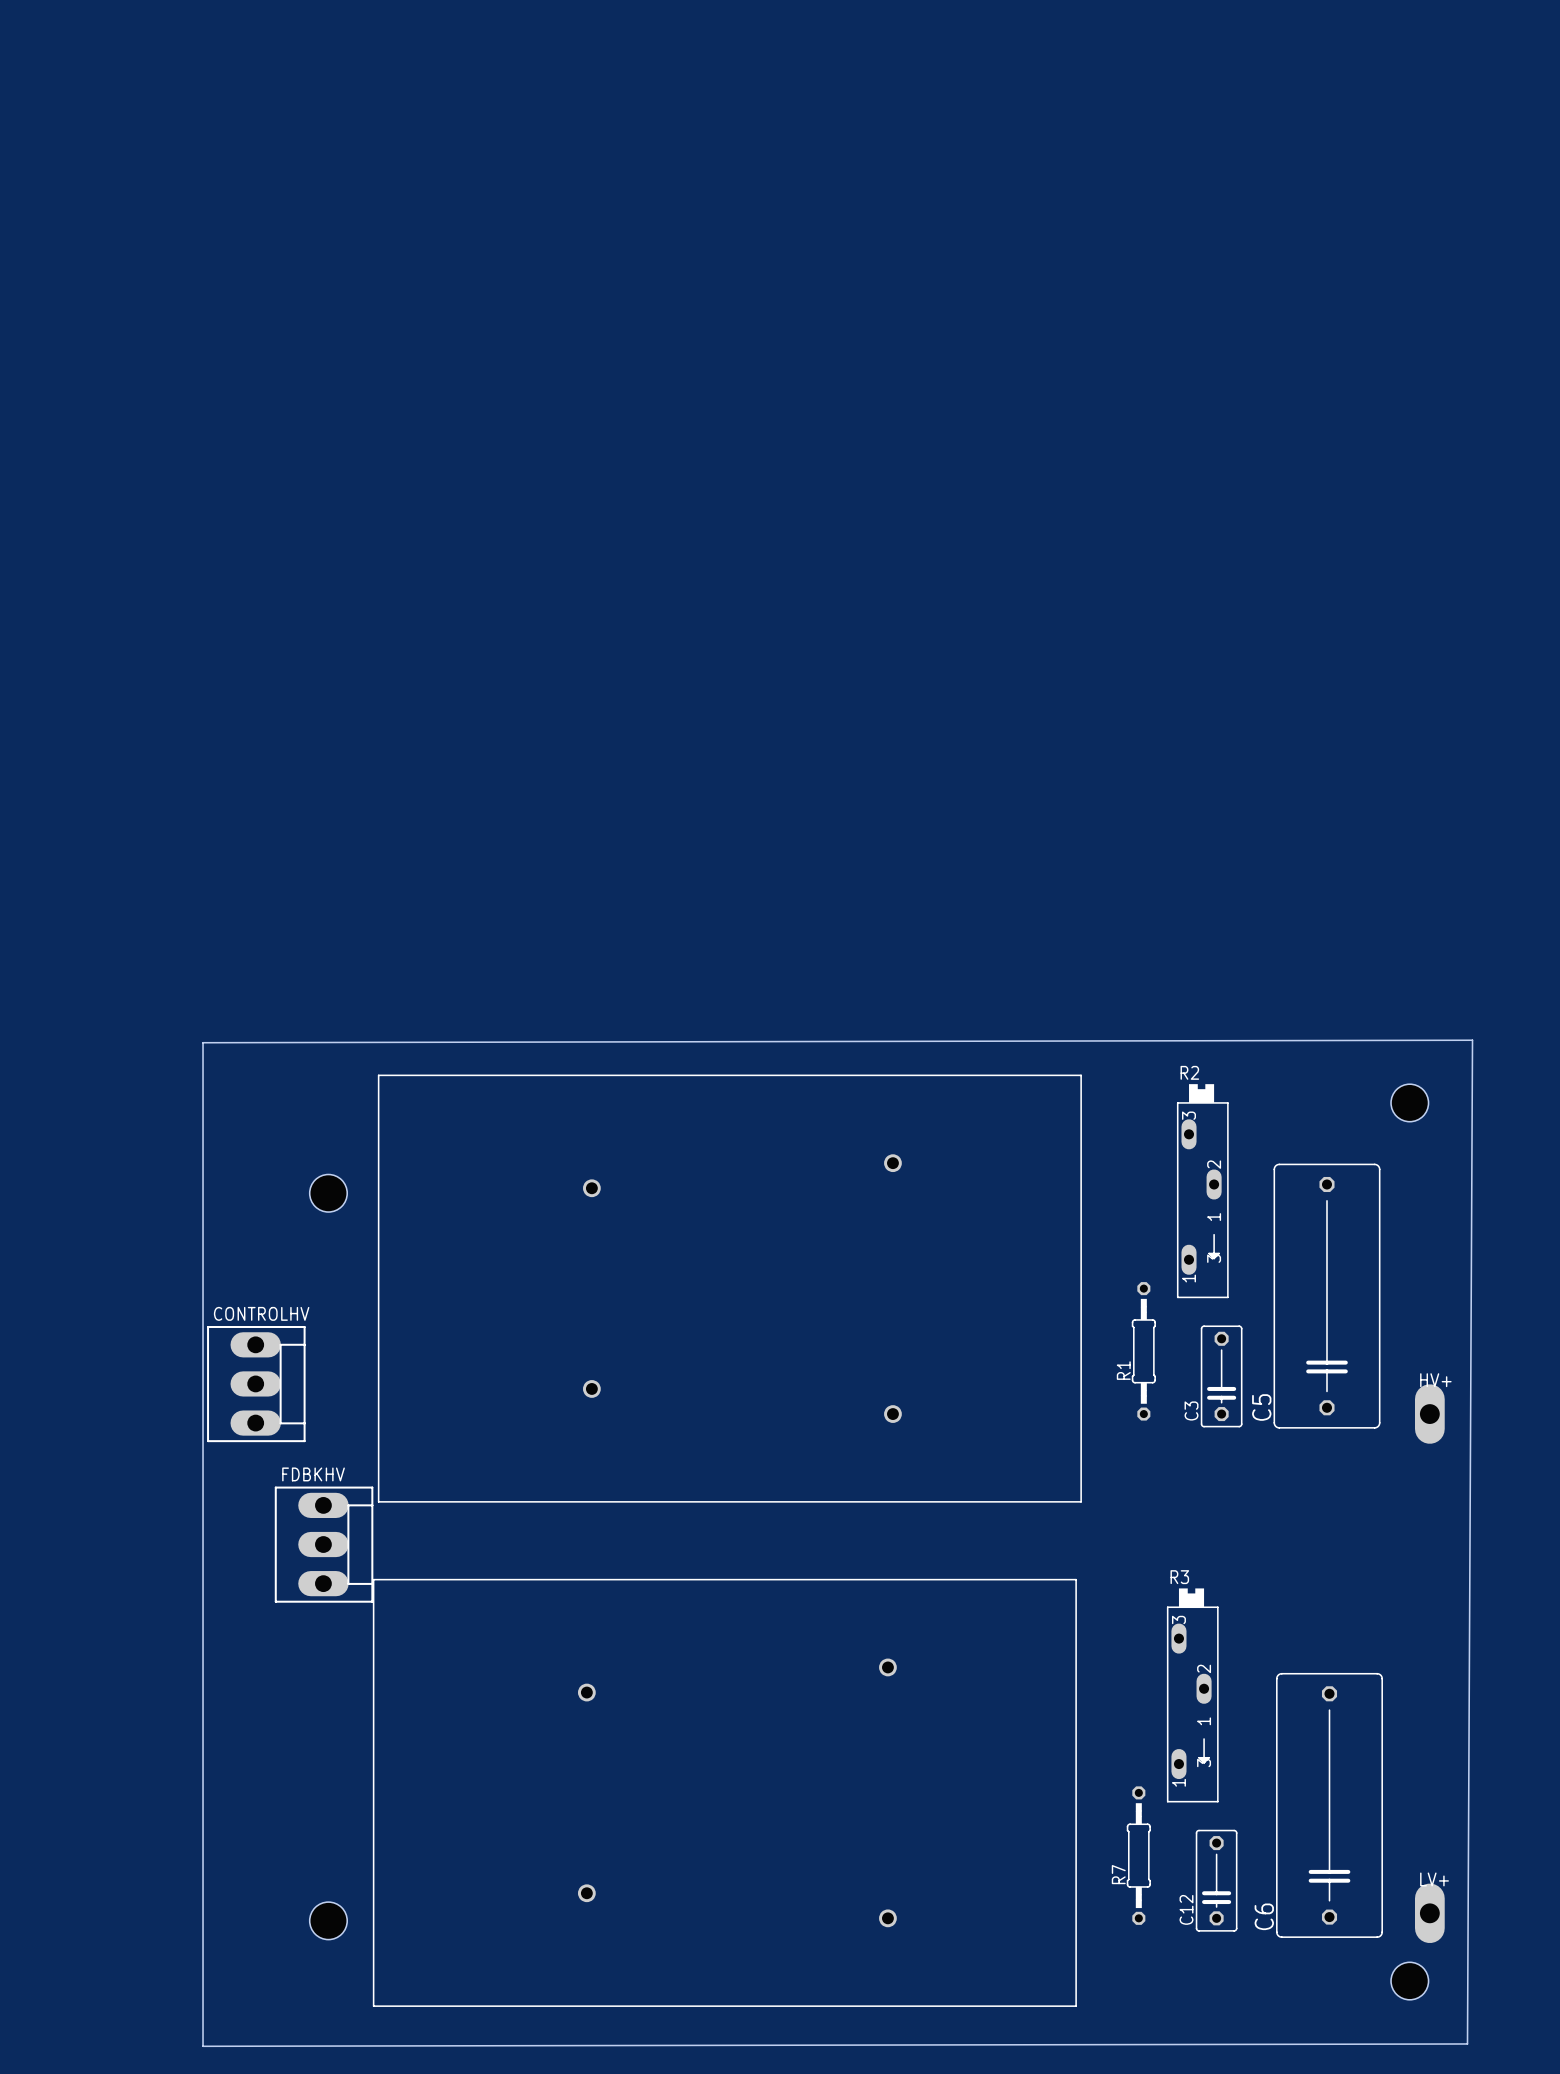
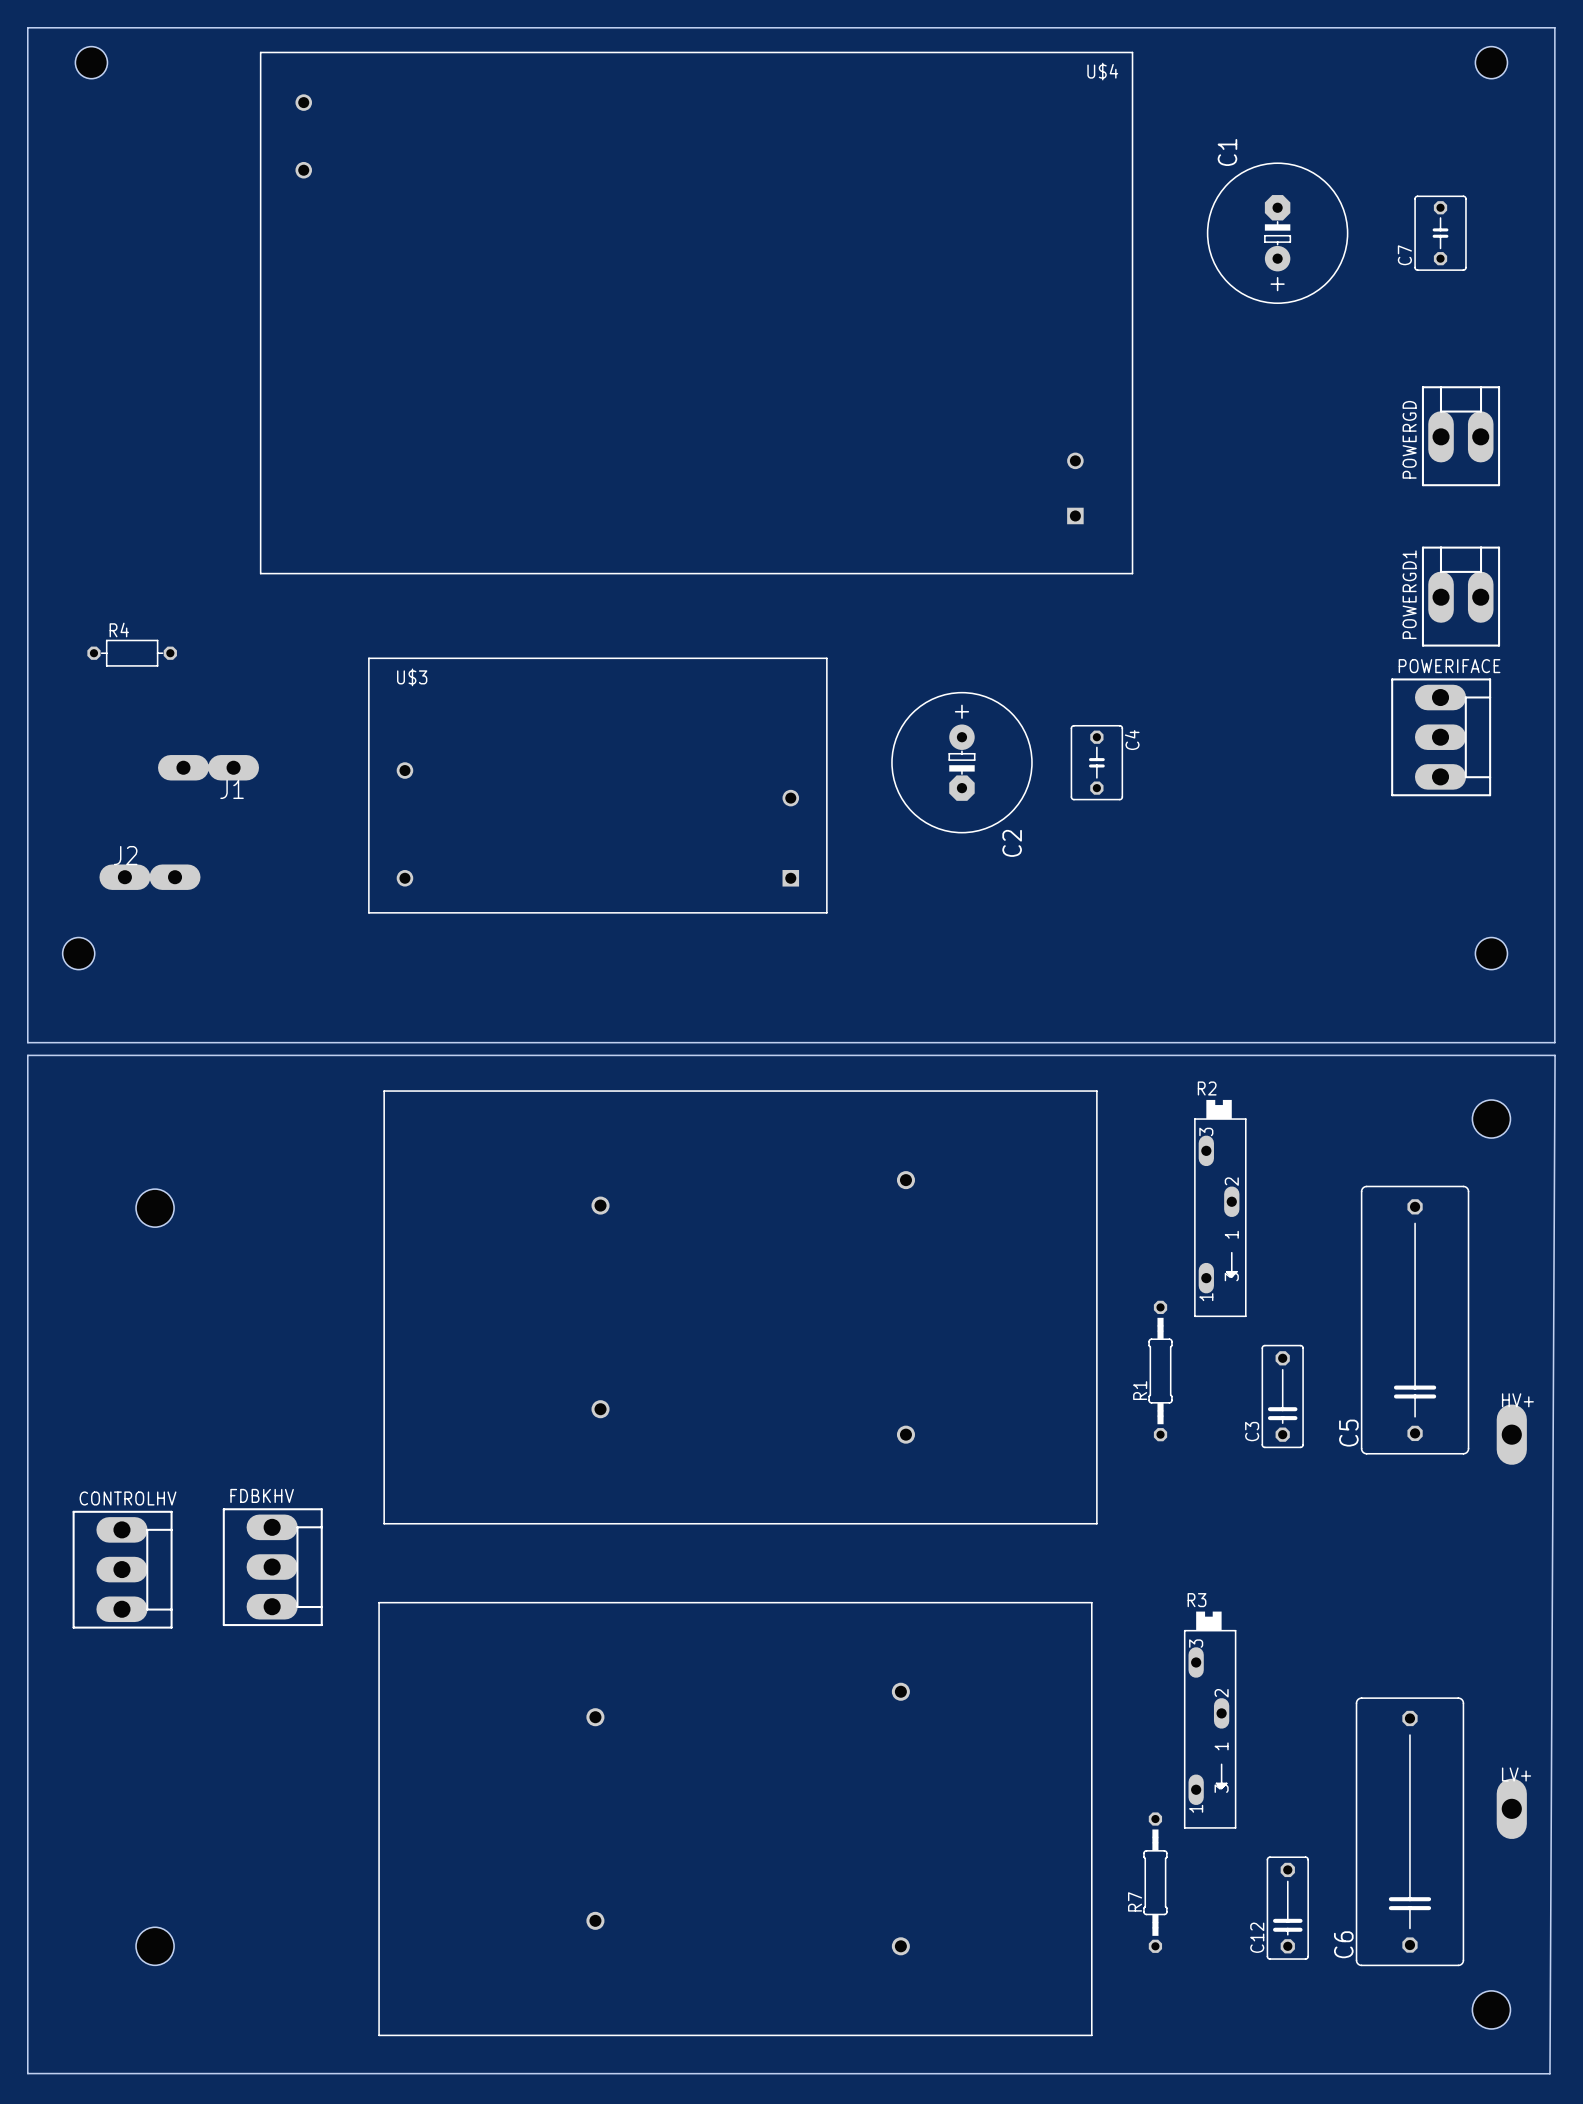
board edge: none -> (27, 27) (27, 1042) (1554, 1042) (1554, 27) (27, 27)
hole: none -> (91, 62)
hole: none -> (1491, 62)
C1: none -> (1277, 233)
C7: none -> (1440, 233)
U$4: none -> (696, 313)
POWERGD: none -> (1461, 436)
POWERGD1: none -> (1461, 596)
R4: none -> (132, 653)
POWERIFACE: none -> (1441, 737)
C2: none -> (961, 762)
C4: none -> (1096, 762)
J1: none -> (208, 767)
U$3: none -> (597, 785)
J2: none -> (149, 877)
hole: none -> (78, 953)
hole: none -> (1491, 953)
board edge: (1472, 1040) (1467, 2043) (203, 2046) (203, 1042) (1472, 1040) -> (27, 1055) (27, 2073) (1549, 2073) (1555, 1055) (27, 1055)
hole position: (1409, 1102) -> (1491, 1119)
hole position: (328, 1193) -> (155, 1208)
C5 position: (1326, 1296) -> (1415, 1320)
C3 position: (1221, 1376) -> (1282, 1396)
CONTROLHV position: (256, 1384) -> (122, 1569)
HV+ position: (1429, 1414) -> (1511, 1434)
FDBKHV position: (324, 1544) -> (272, 1567)
C6 position: (1329, 1805) -> (1409, 1831)
C12 position: (1216, 1880) -> (1287, 1908)
LV+ position: (1429, 1913) -> (1511, 1808)
hole position: (328, 1920) -> (155, 1946)
hole position: (1409, 1981) -> (1491, 2009)

